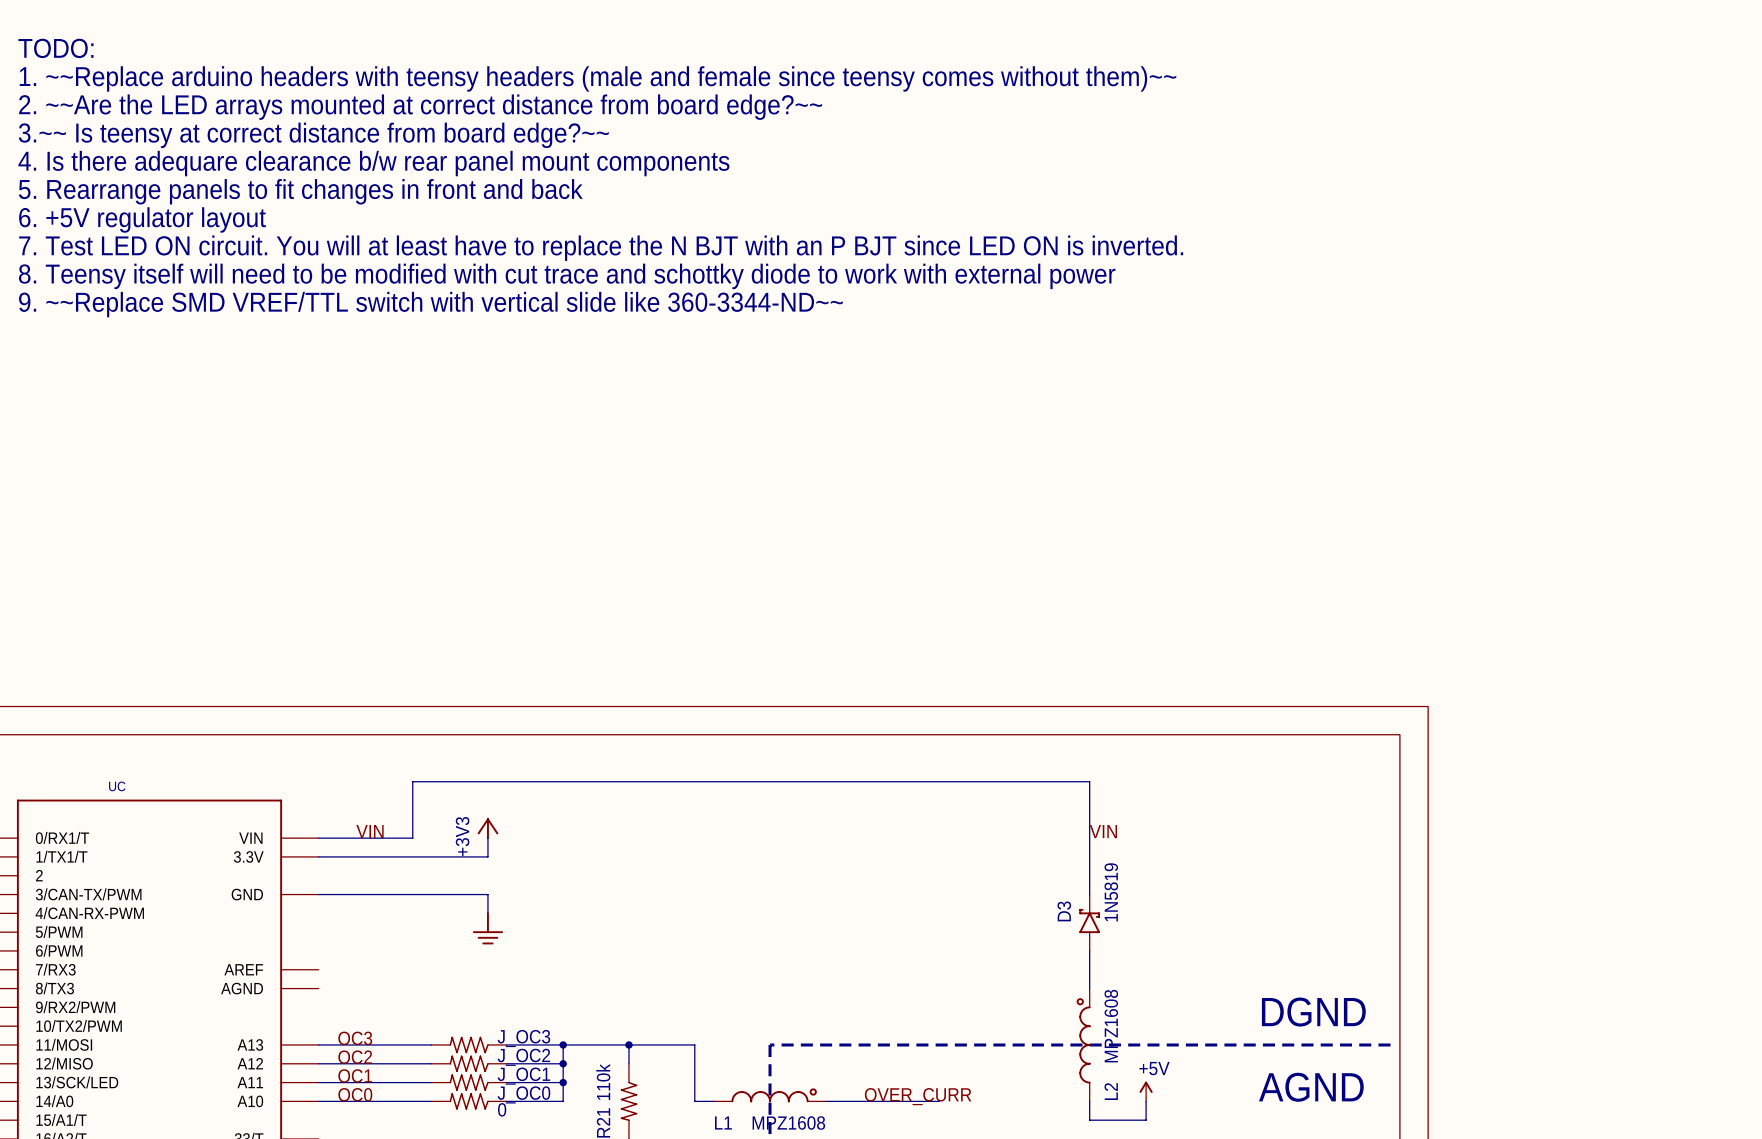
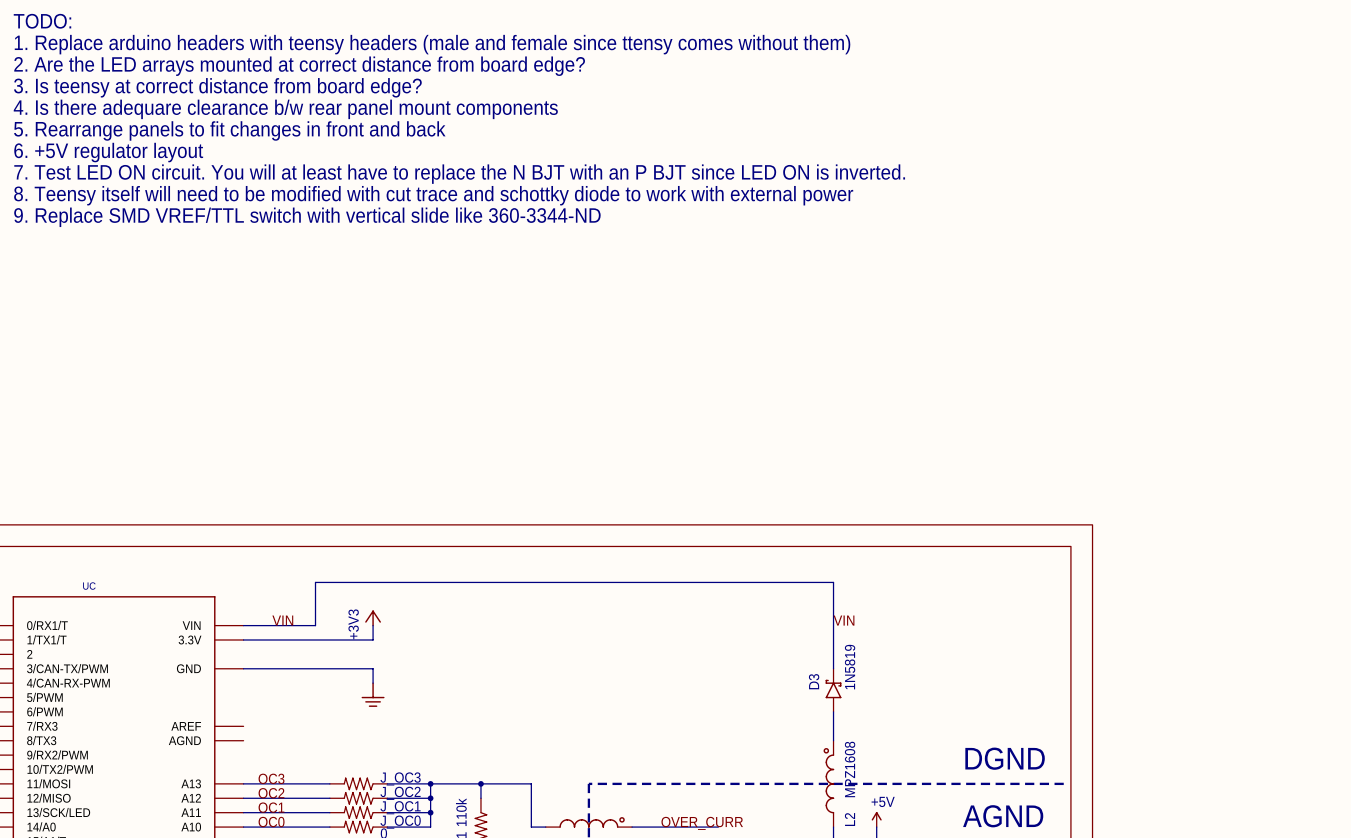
text: 1. ~~Replace arduino headers with teensy headers (male and female since teensy comes without them)~~ (598, 78) -> 1. Replace arduino headers with teensy headers (male and female since ttensy comes without them) (432, 44)
text: 2. ~~Are the LED arrays mounted at correct distance from board edge?~~ (420, 107) -> 2. Are the LED arrays mounted at correct distance from board edge? (299, 66)
text: 3.~~ Is teensy at correct distance from board edge?~~ (313, 135) -> 3. Is teensy at correct distance from board edge? (217, 87)
text: 9. ~~Replace SMD VREF/TTL switch with vertical slide like 360‑3344‑ND~~ (430, 304) -> 9. Replace SMD VREF/TTL switch with vertical slide like 360‑3344‑ND (307, 217)

